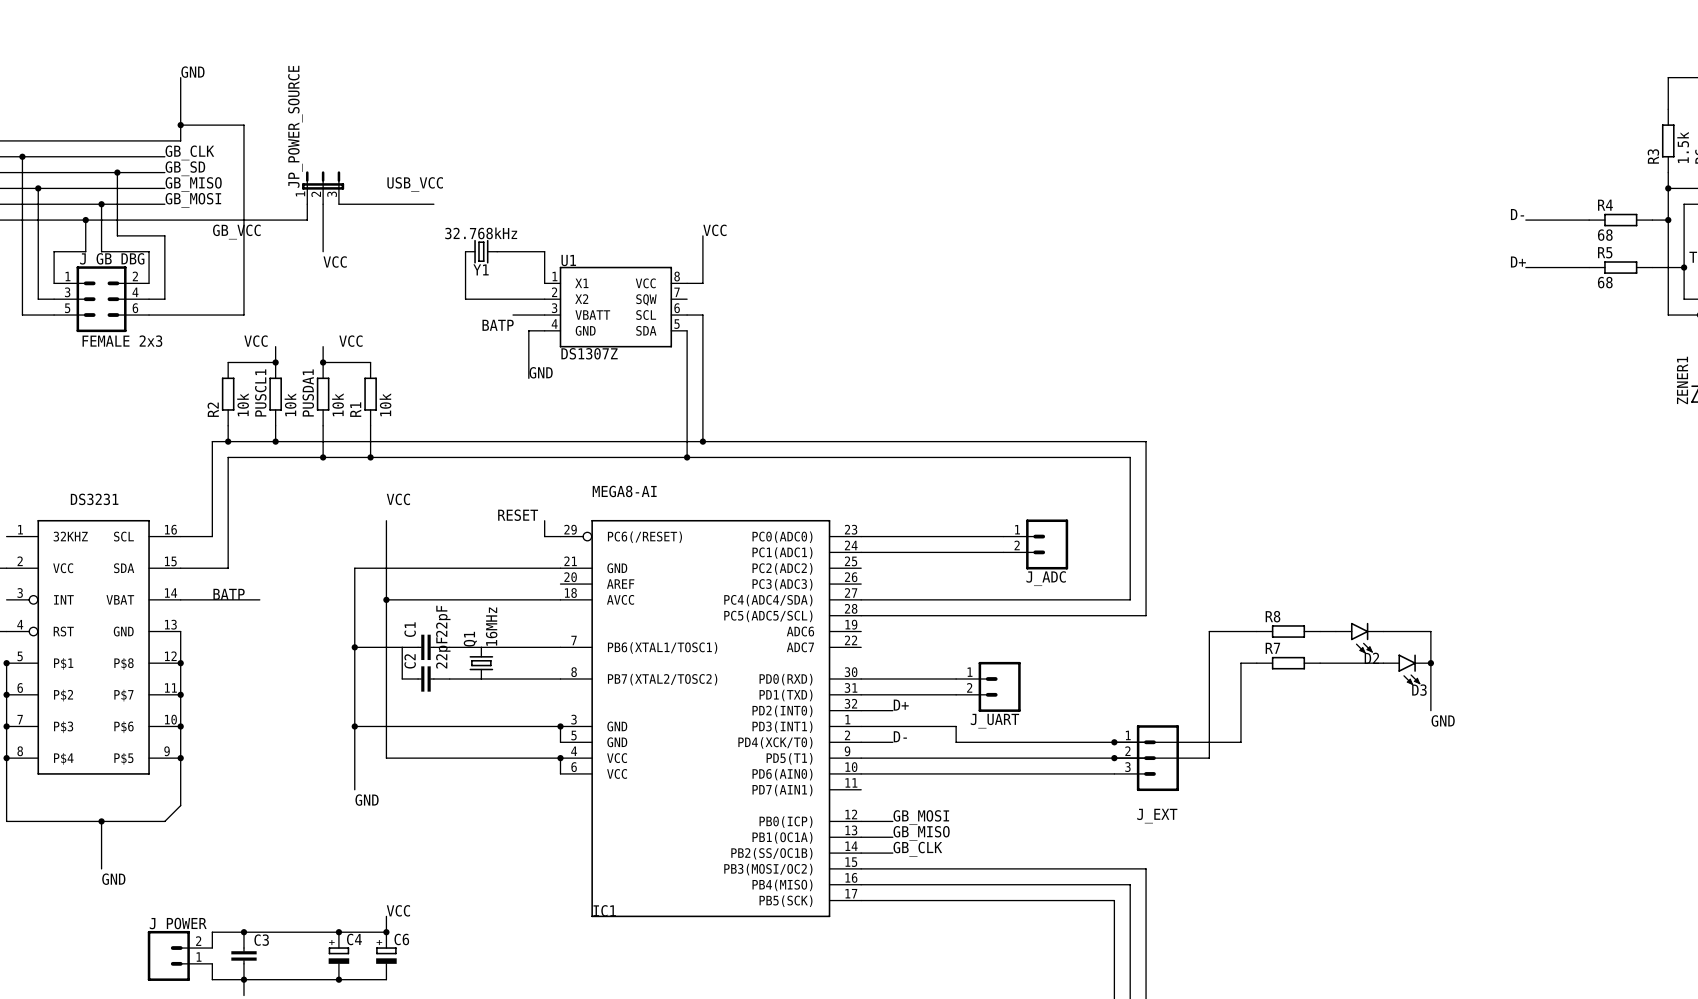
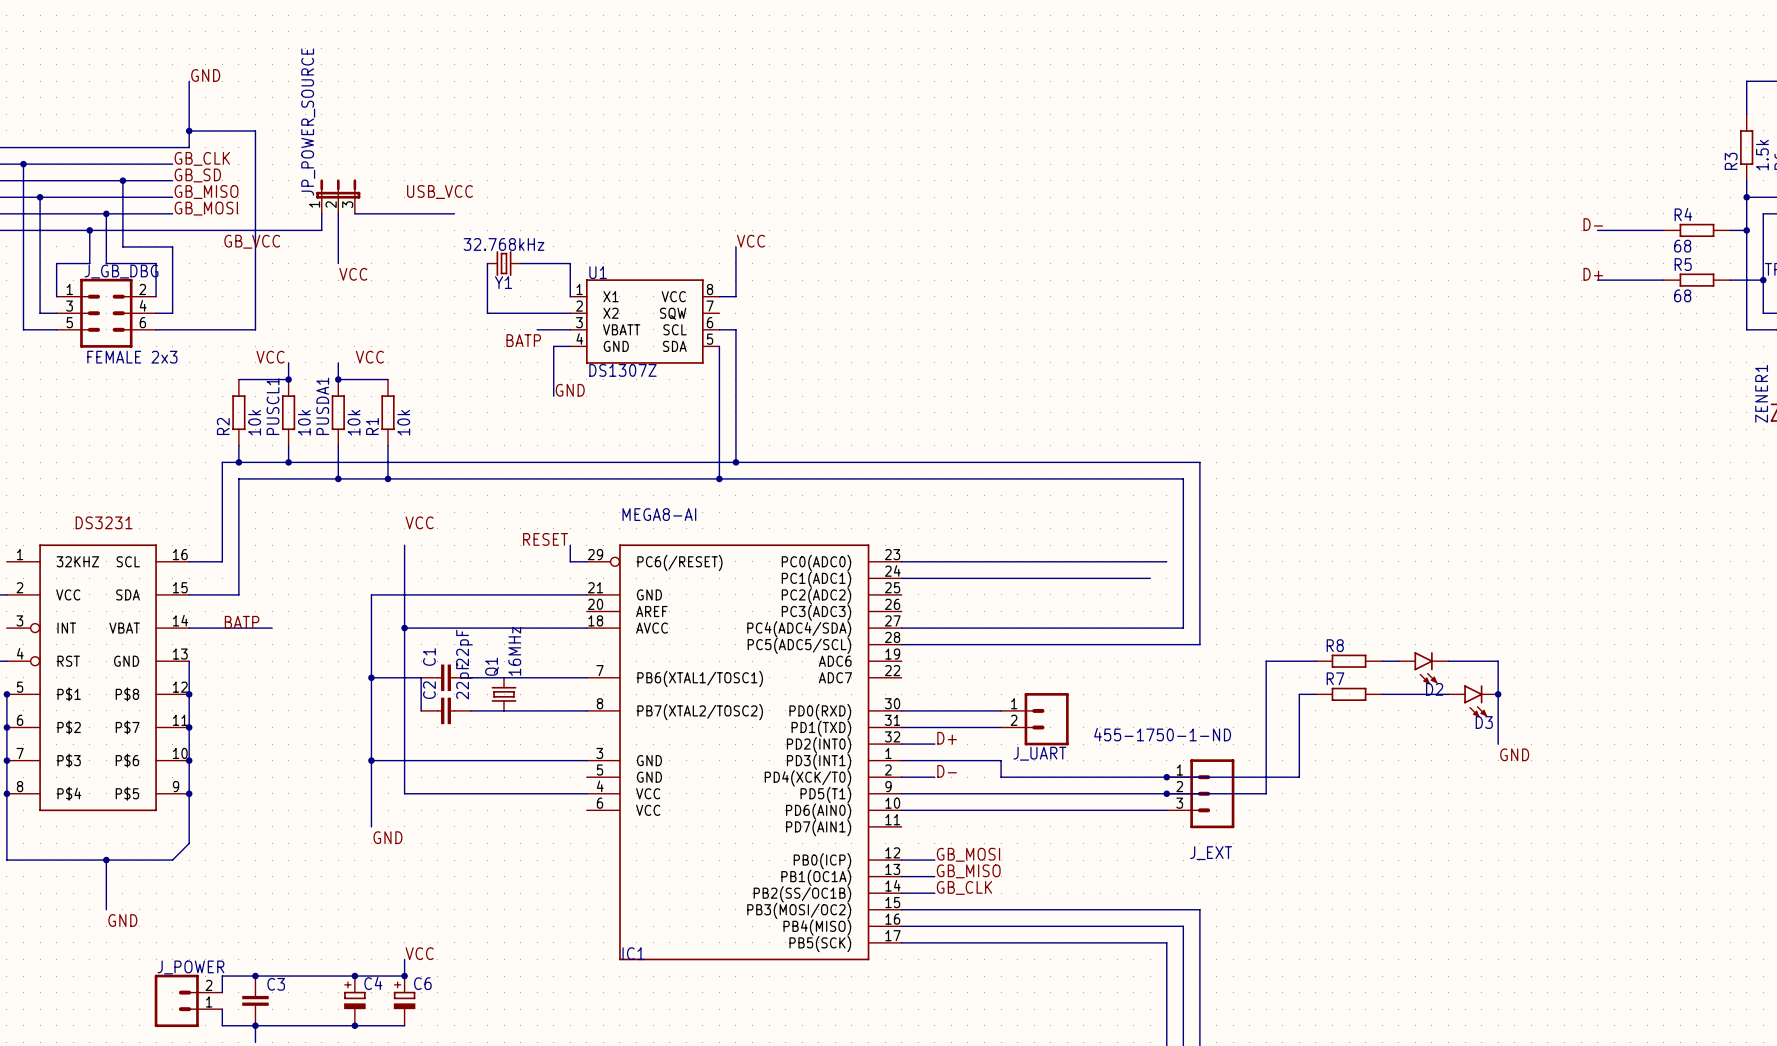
wire: none -> (1050, 561) (1166, 561)
J_ADC: (1035, 544) -> none
wire: none -> (1050, 578) (1150, 578)
J_EXT value: none -> 455-1750-1-ND (1162, 734)
wire: (560, 726) (560, 742) -> none
junction: (560, 726) -> none
wire: (560, 758) (560, 773) -> none
junction: (560, 758) -> none

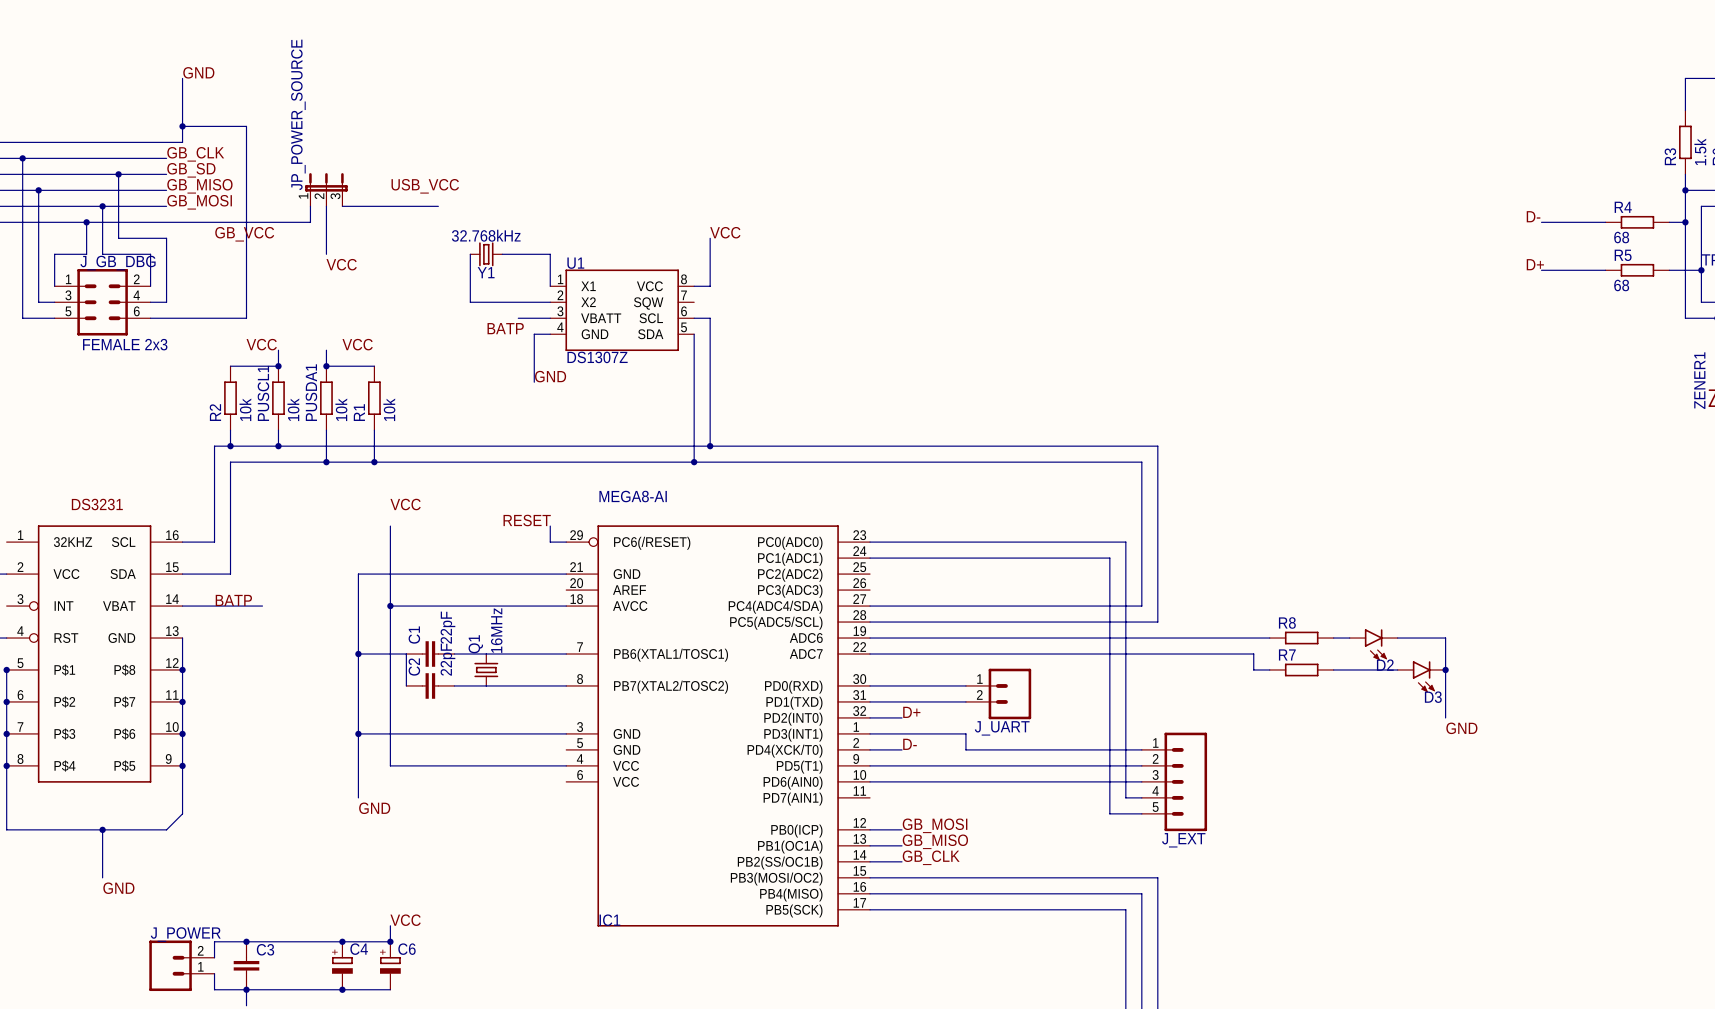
wire: none -> (1125, 542) (1125, 797) (1141, 797)
wire: none -> (1109, 558) (1109, 813) (1141, 813)
wire: (1266, 661) (1266, 793) (1183, 793) -> (1221, 638) (870, 638)
wire: (1299, 694) (1299, 777) (1183, 777) -> (1253, 669) (1253, 654) (870, 654)
junction: (1166, 777) -> none
junction: (1166, 793) -> none
J_EXT: 455-1750-1-ND (1200, 793) -> none
J_EXT: none -> (1174, 781)

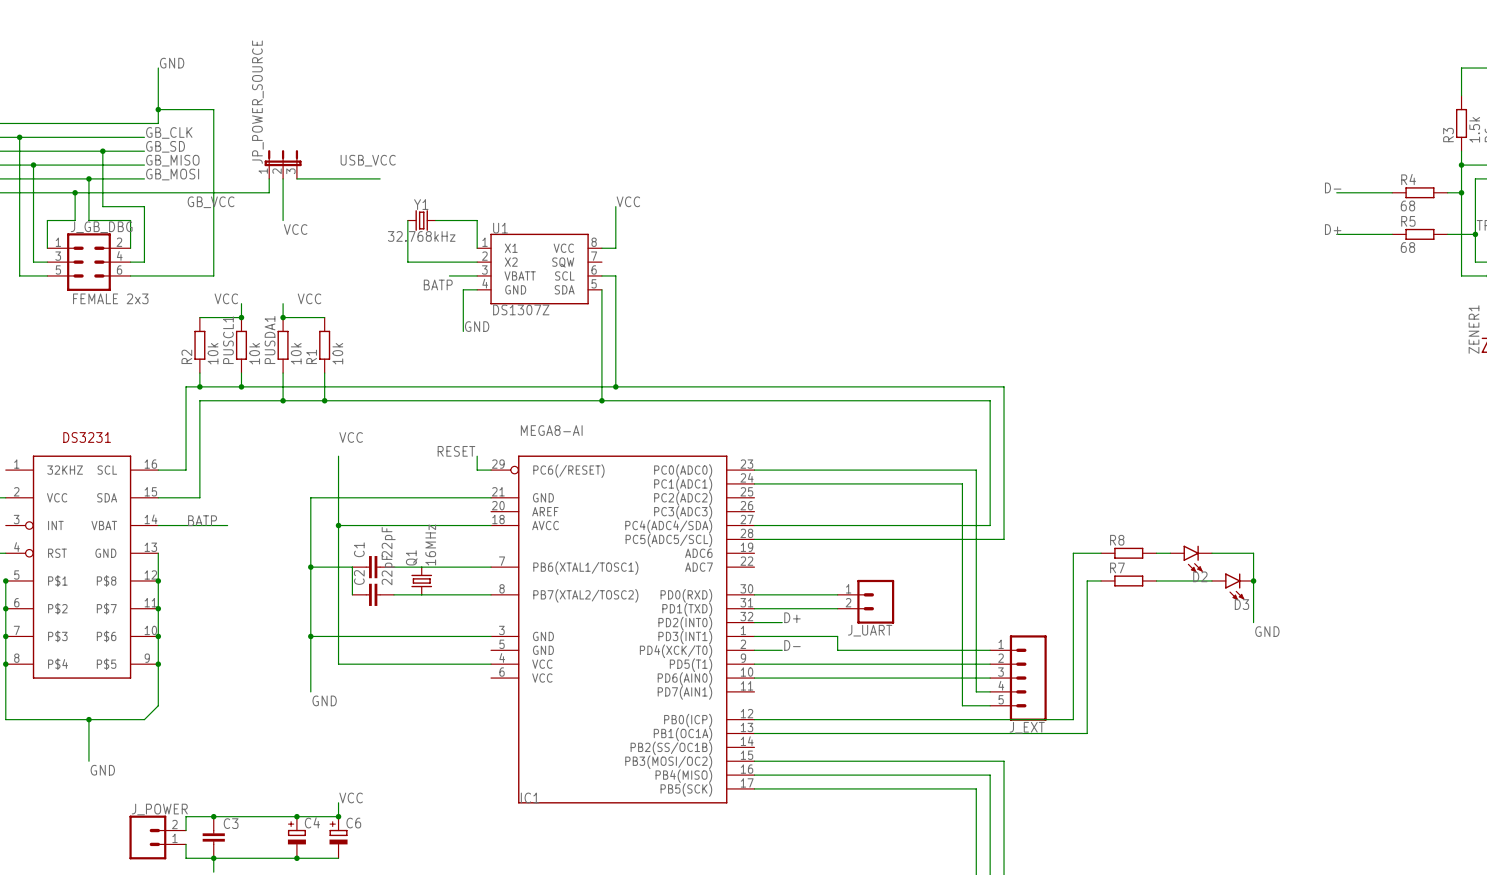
Y1 value position: 32.768kHz (486, 235) -> 32.768kHz (421, 236)
Y1 name position: Y1 (486, 272) -> Y1 (421, 204)
wire: (870, 638) (1237, 638) -> (782, 719) (1073, 719) (1073, 553)
wire: (870, 654) (1253, 654) (1253, 669) -> (782, 733) (1087, 733) (1087, 580)
label: GB_MOSI (935, 825) -> none
label: GB_MISO (935, 841) -> none
label: GB_CLK (931, 857) -> none
wire: (870, 861) (902, 861) -> none

